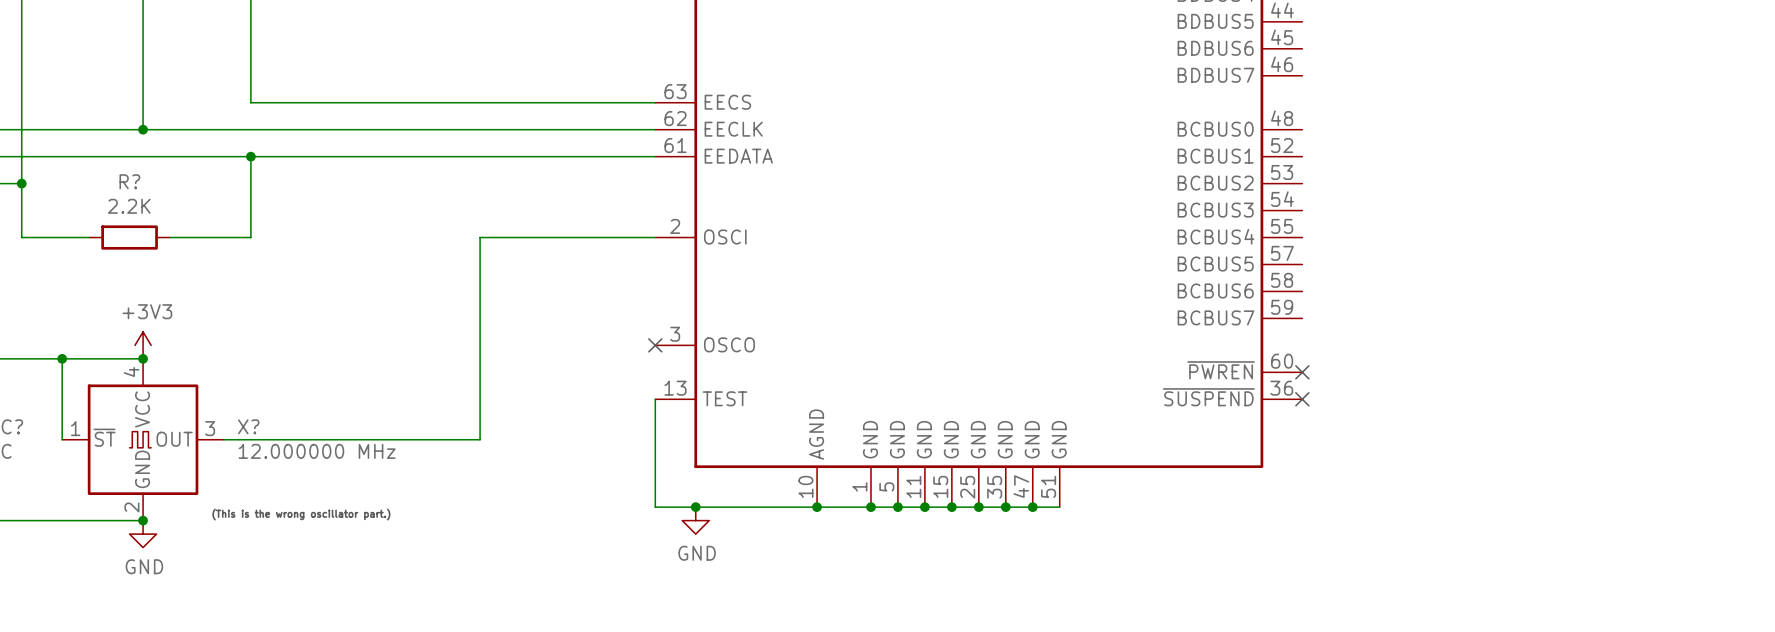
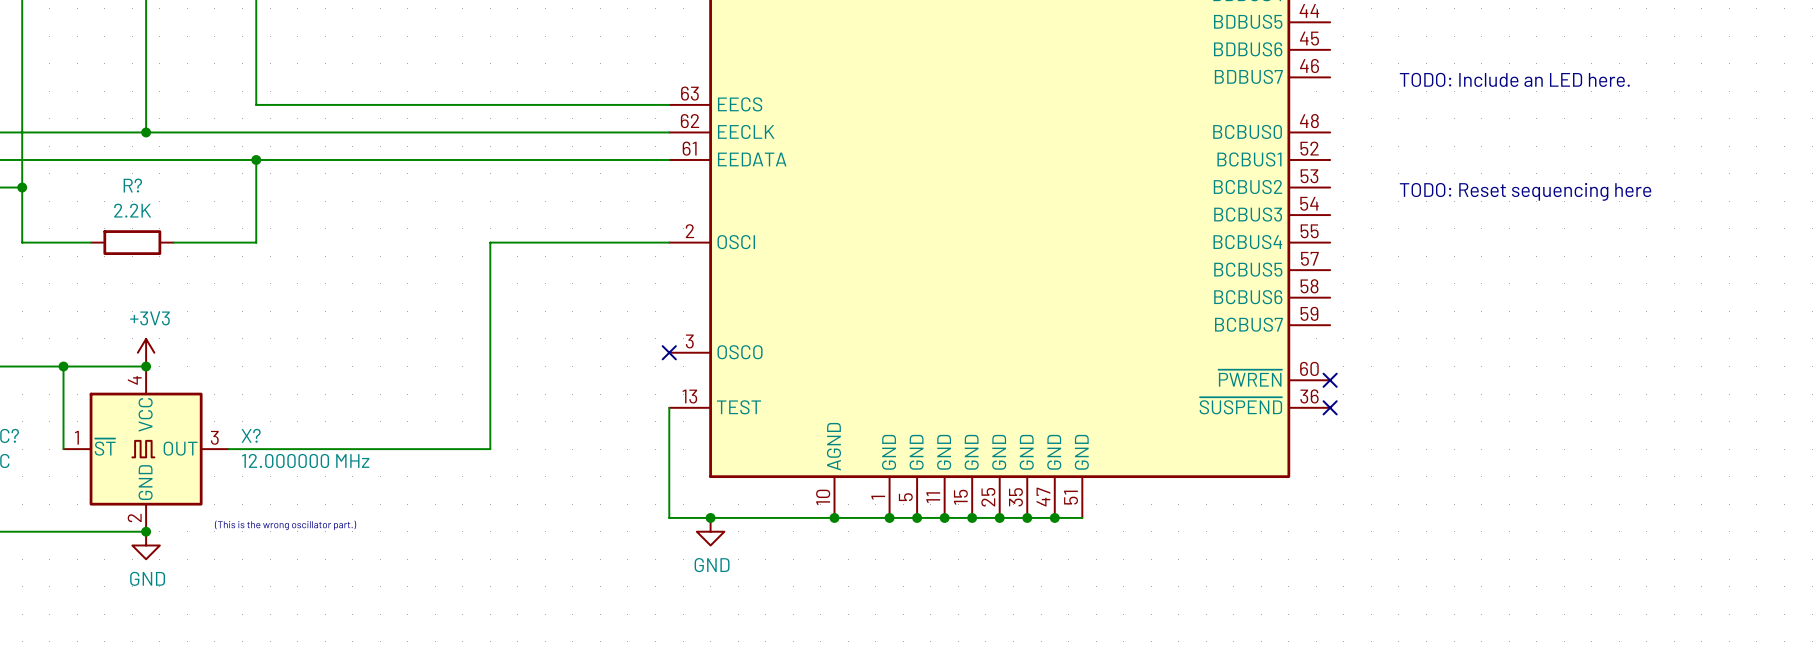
text: none -> TODO: Include an LED here. (1514, 79)
text: none -> TODO: Reset sequencing here (1525, 191)

